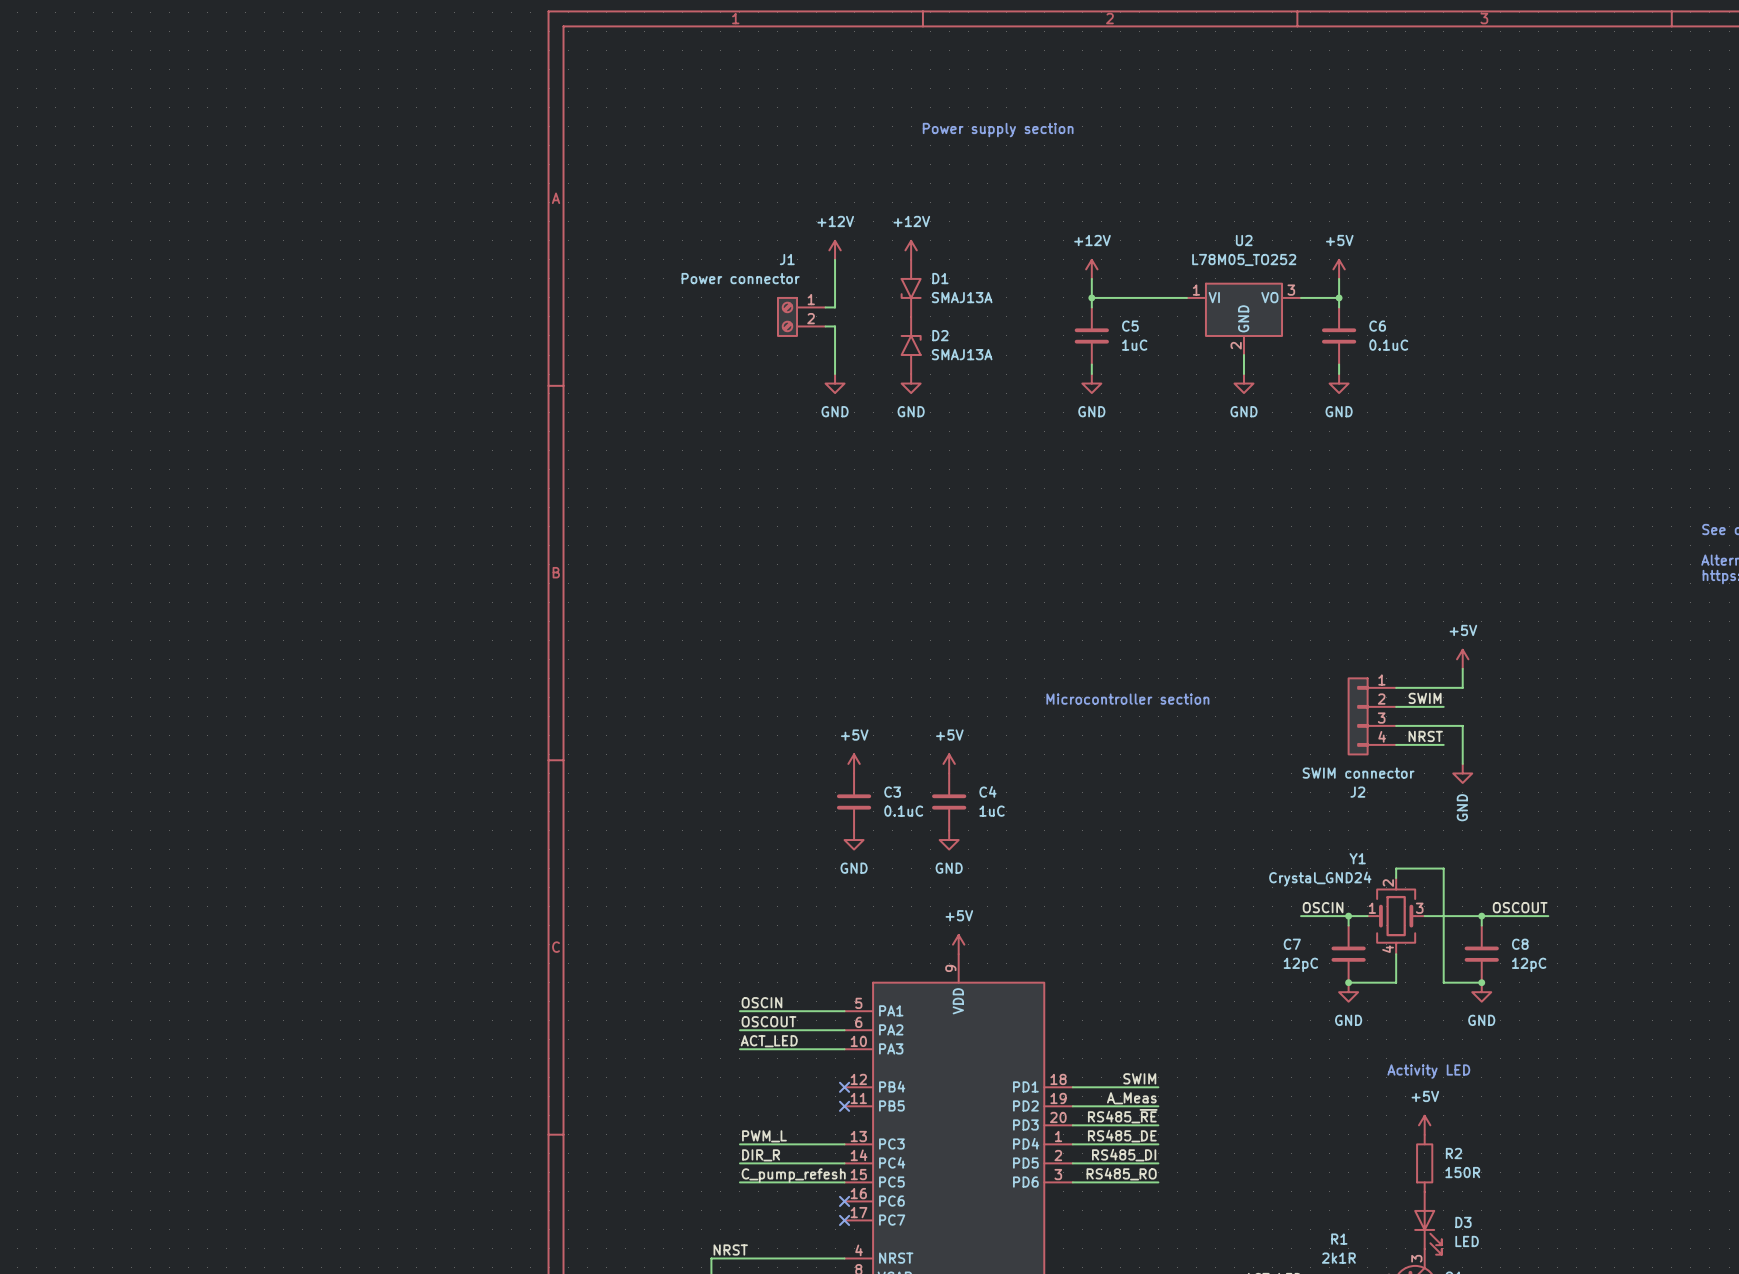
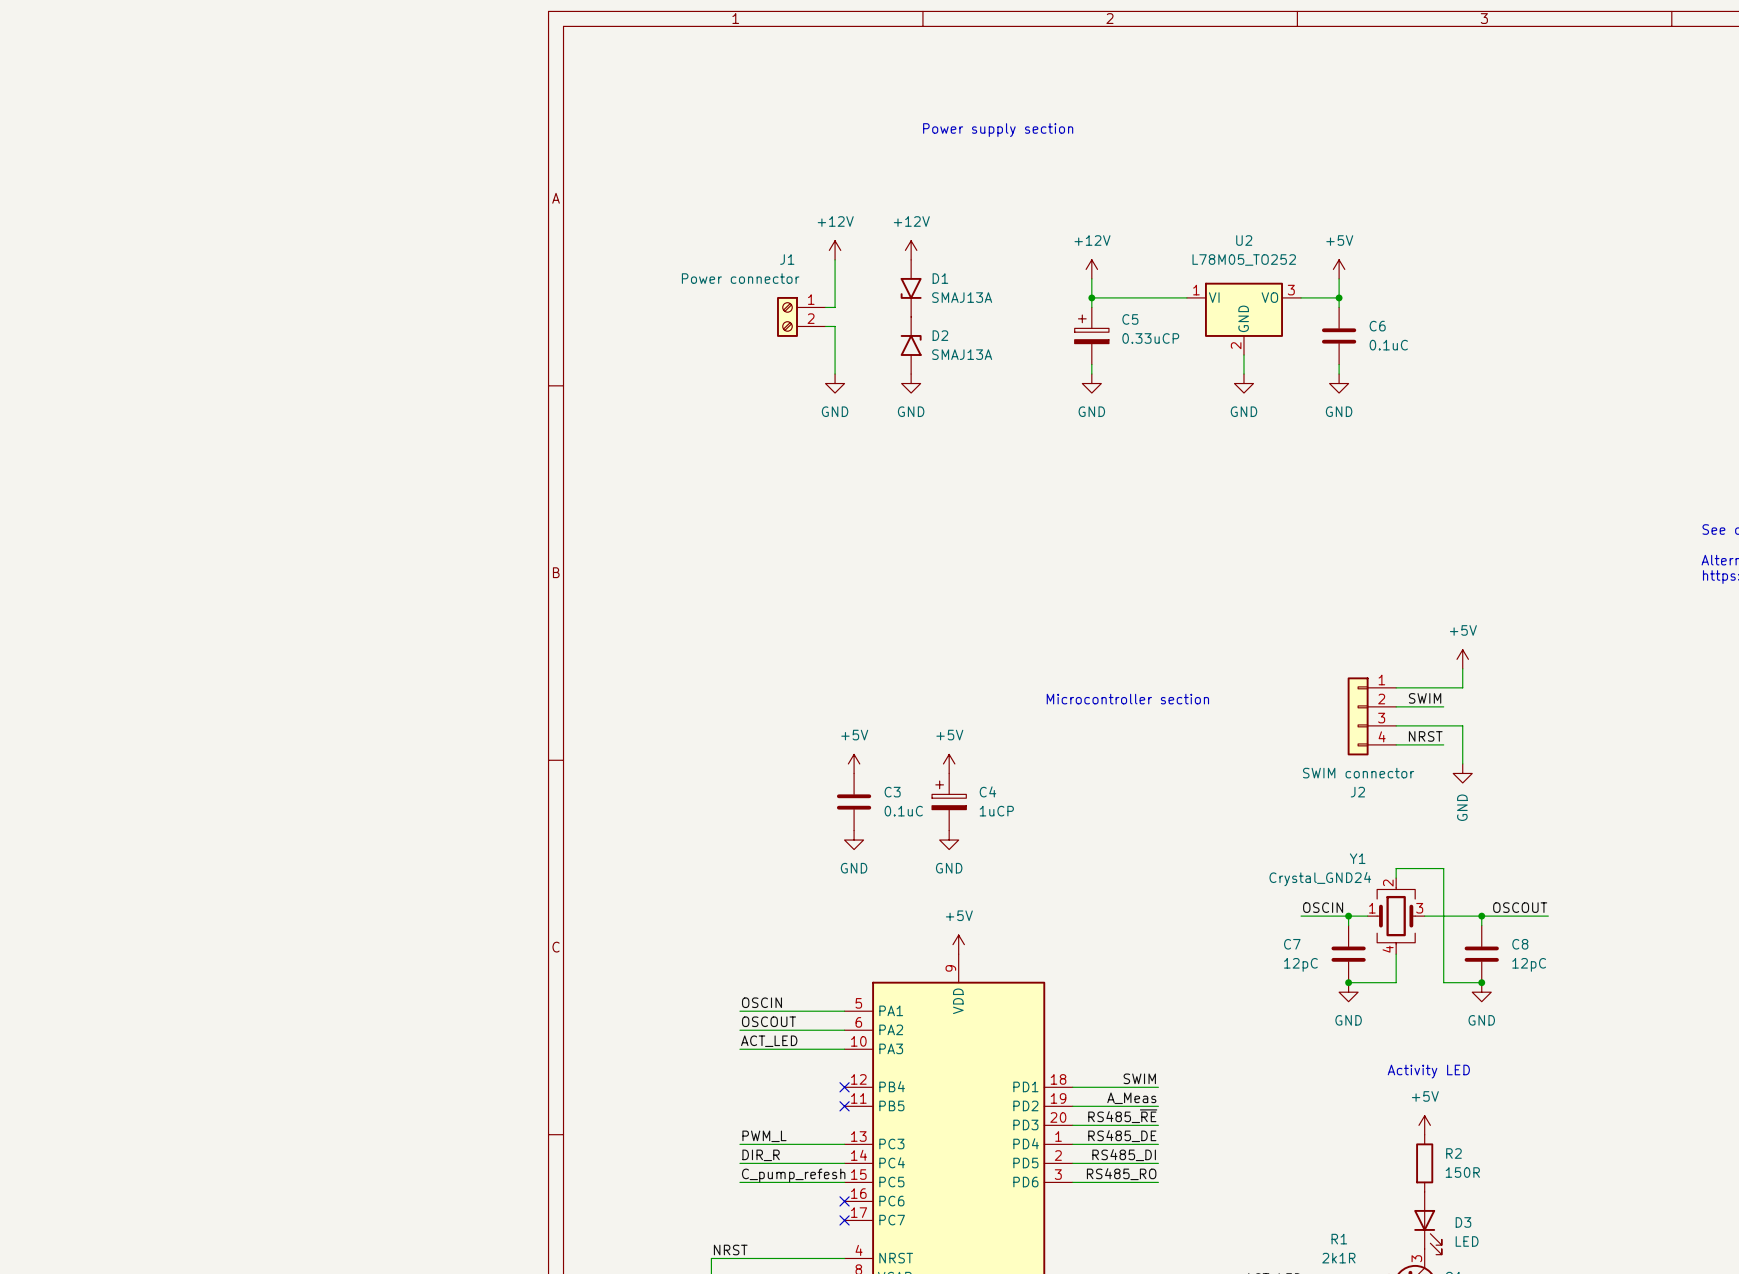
C5 symbol: [1074, 307, 1109, 365] -> [1074, 307, 1109, 365]
C5 value: 1uC (1134, 345) -> 0.33uCP (1150, 338)
C4 symbol: [932, 773, 967, 831] -> [932, 773, 967, 831]
C4 value: 1uC (992, 811) -> 1uCP (996, 811)

